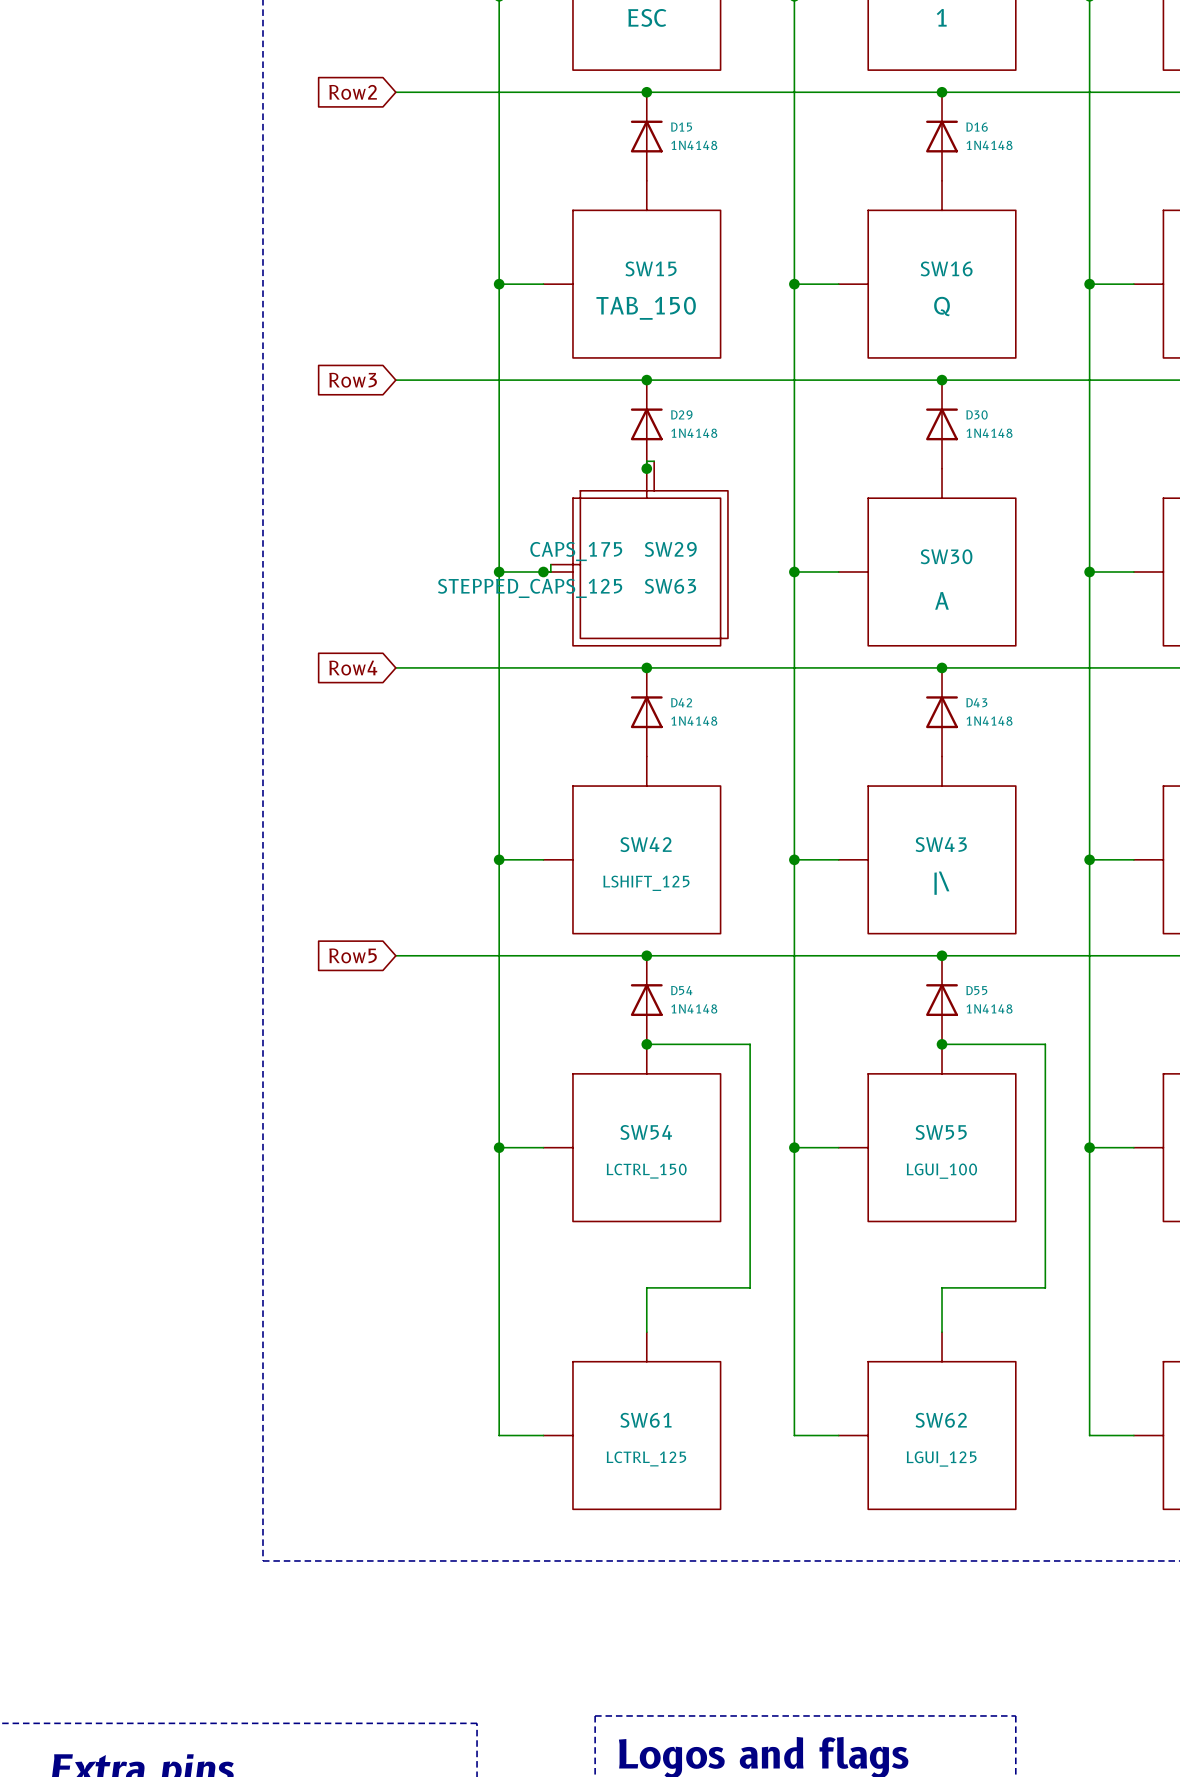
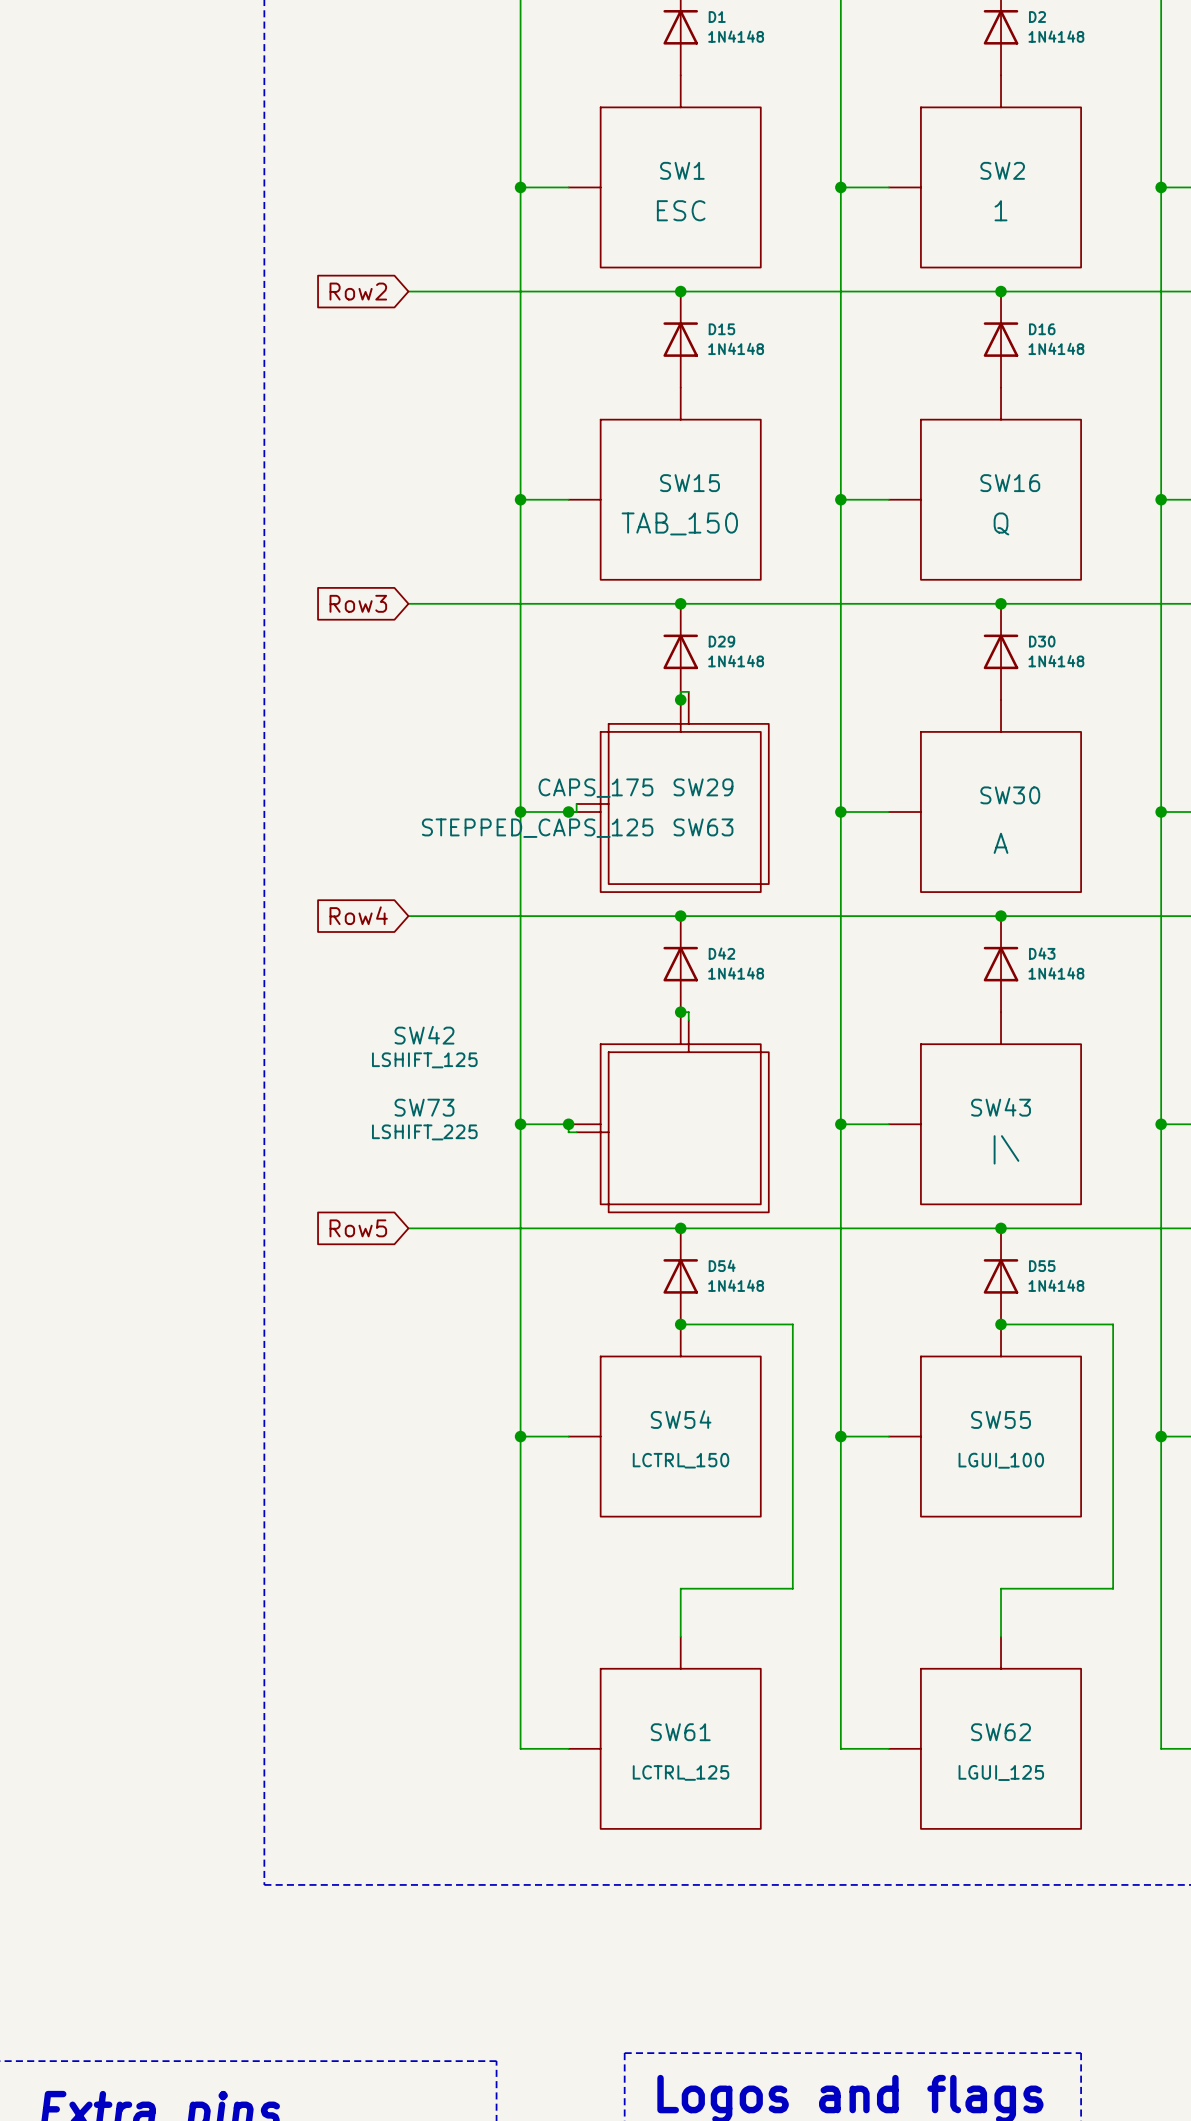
wire: none -> (680, 1012) (688, 1012) (688, 1020)
junction: none -> (680, 1012)
SW42 name position: SW42 (645, 844) -> SW42 (424, 1035)
SW73: none -> LSHIFT_225 (672, 1116)
wire: none -> (568, 1124) (568, 1132) (576, 1132)
junction: none -> (568, 1124)
SW42 value position: LSHIFT_125 (646, 883) -> LSHIFT_125 (424, 1060)

